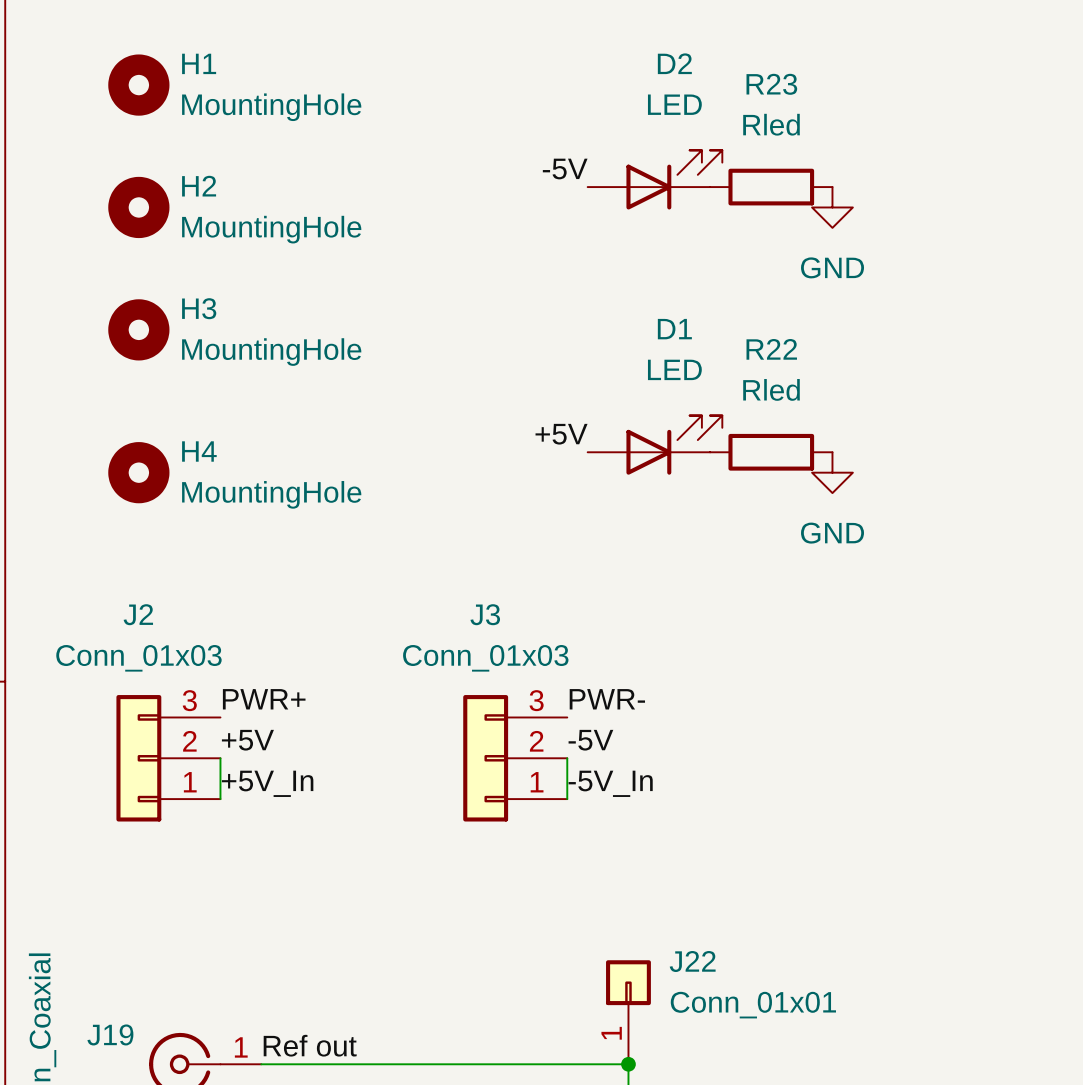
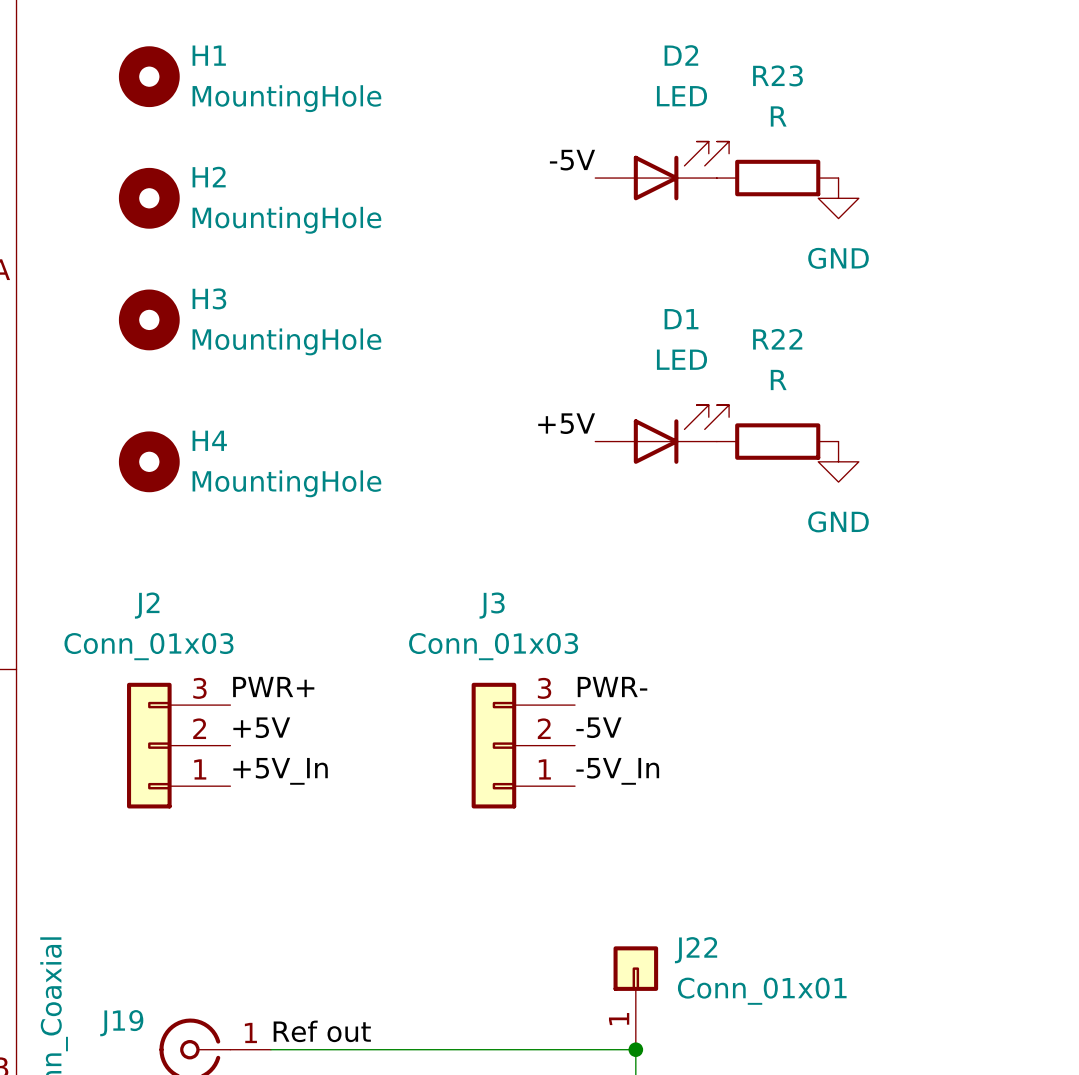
R23 value: Rled (771, 124) -> R (778, 116)
R22 value: Rled (771, 389) -> R (778, 379)
wire: (220, 758) (220, 799) -> none
wire: (567, 758) (567, 799) -> none

